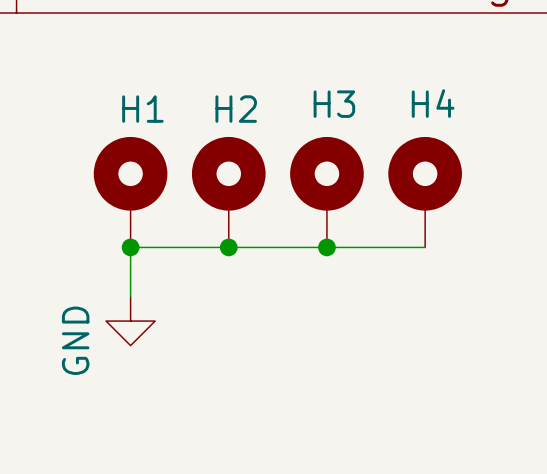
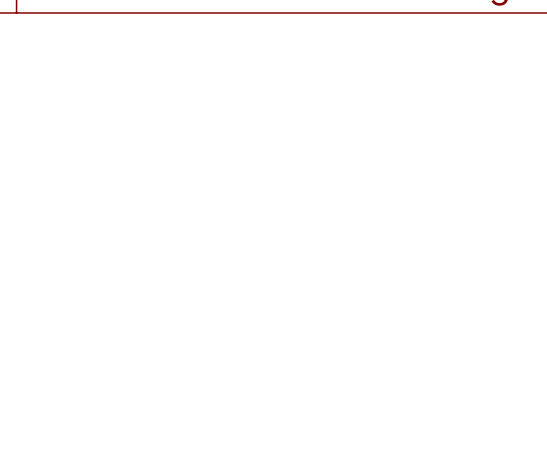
H1: (130, 192) -> none
H2: (228, 192) -> none
H3: (326, 192) -> none
H4: (425, 192) -> none
junction: (130, 247) -> none
junction: (228, 247) -> none
junction: (326, 247) -> none
wire: (425, 247) (130, 247) (130, 296) -> none
power symbol: GND (130, 321) -> none

